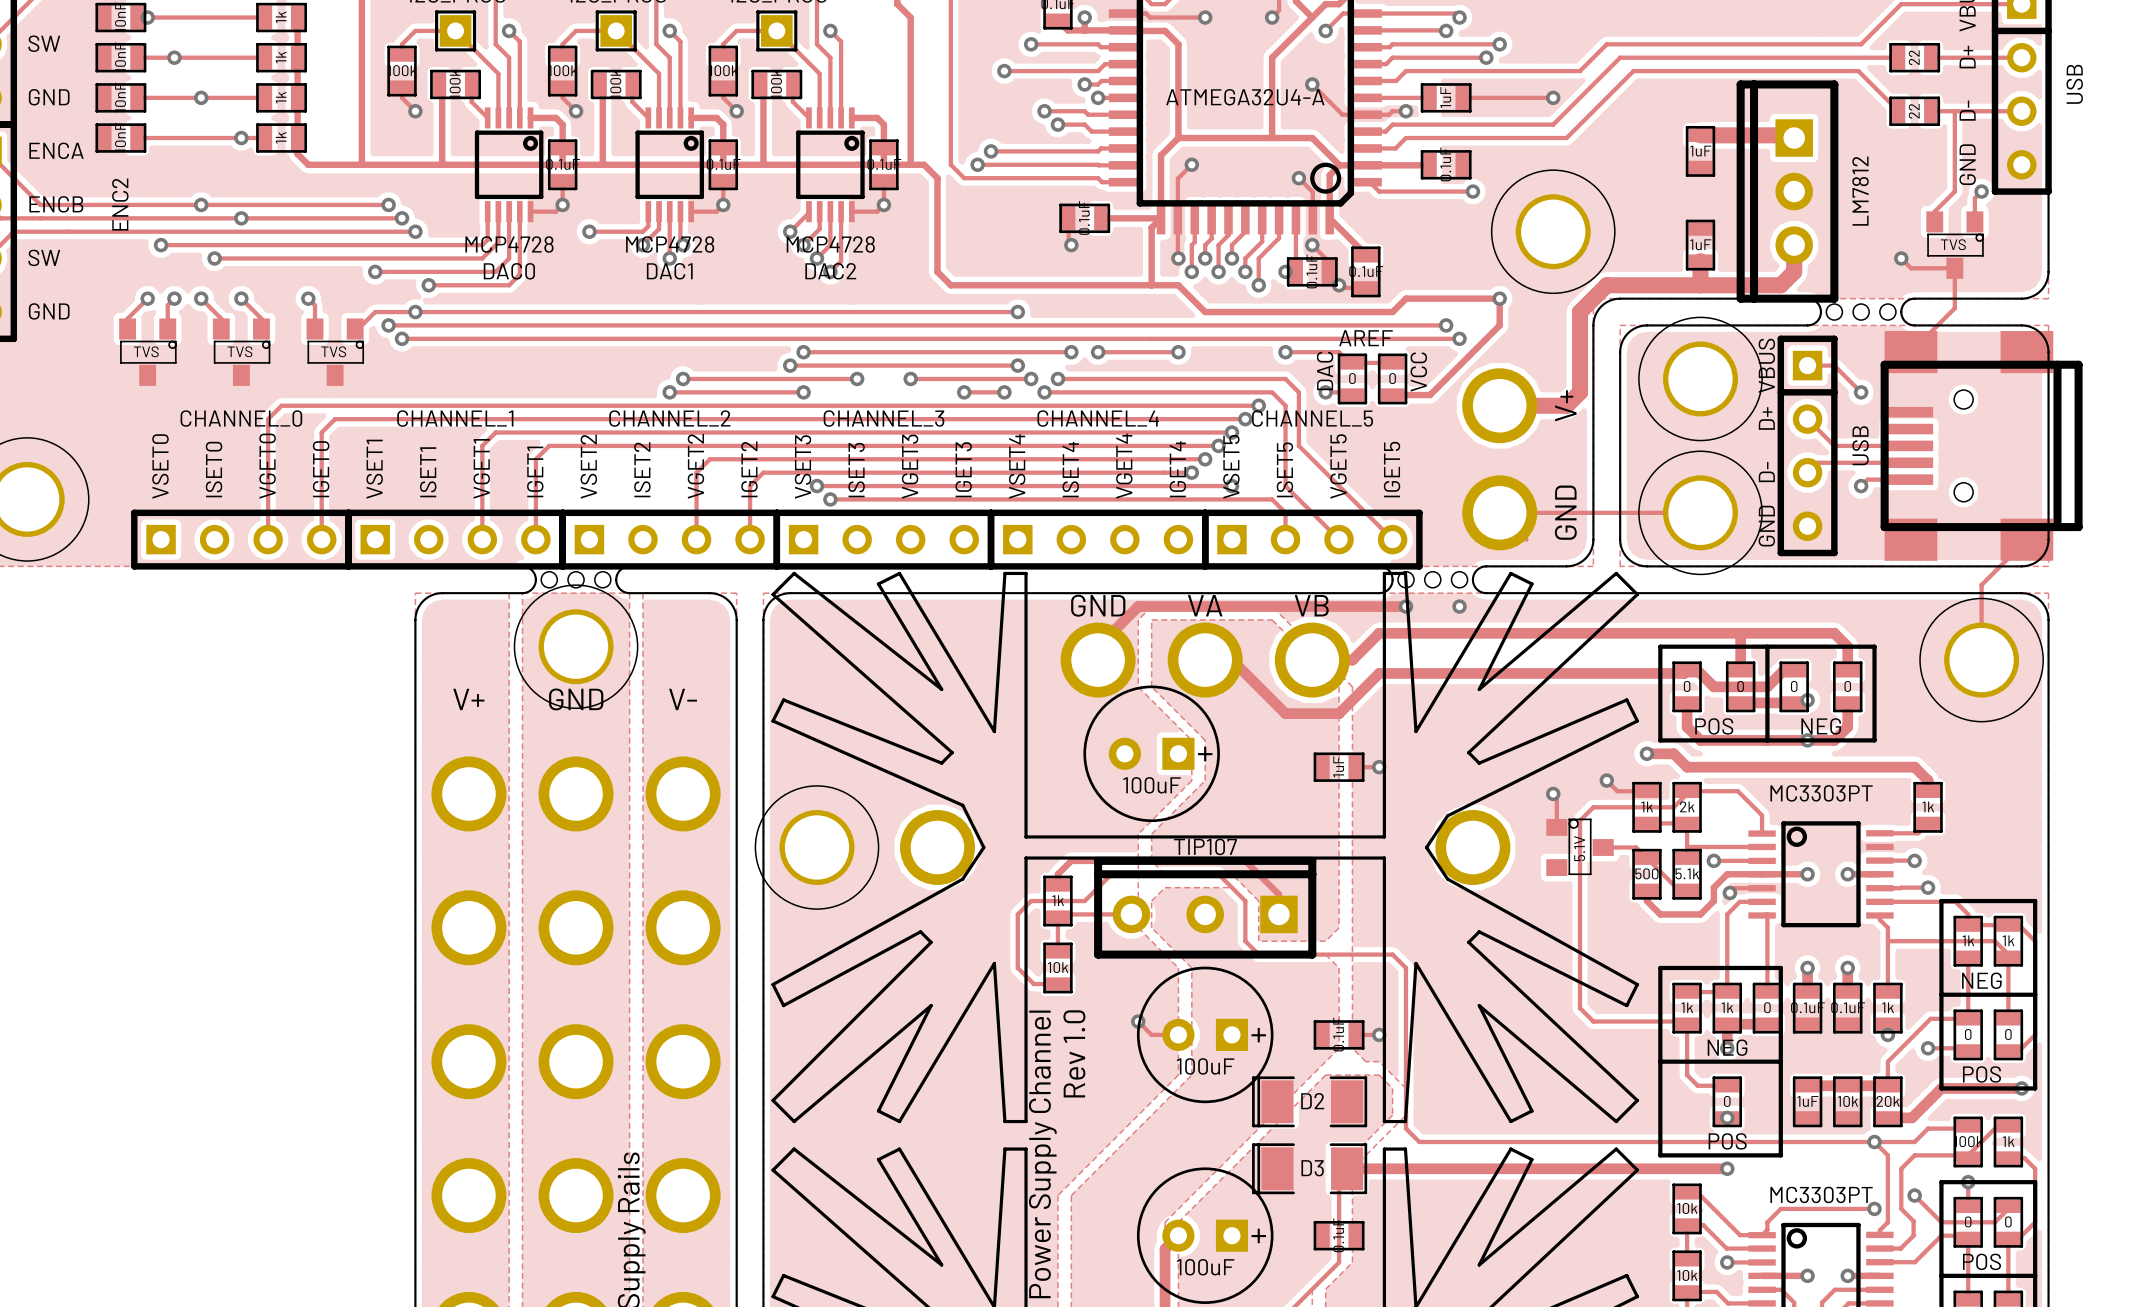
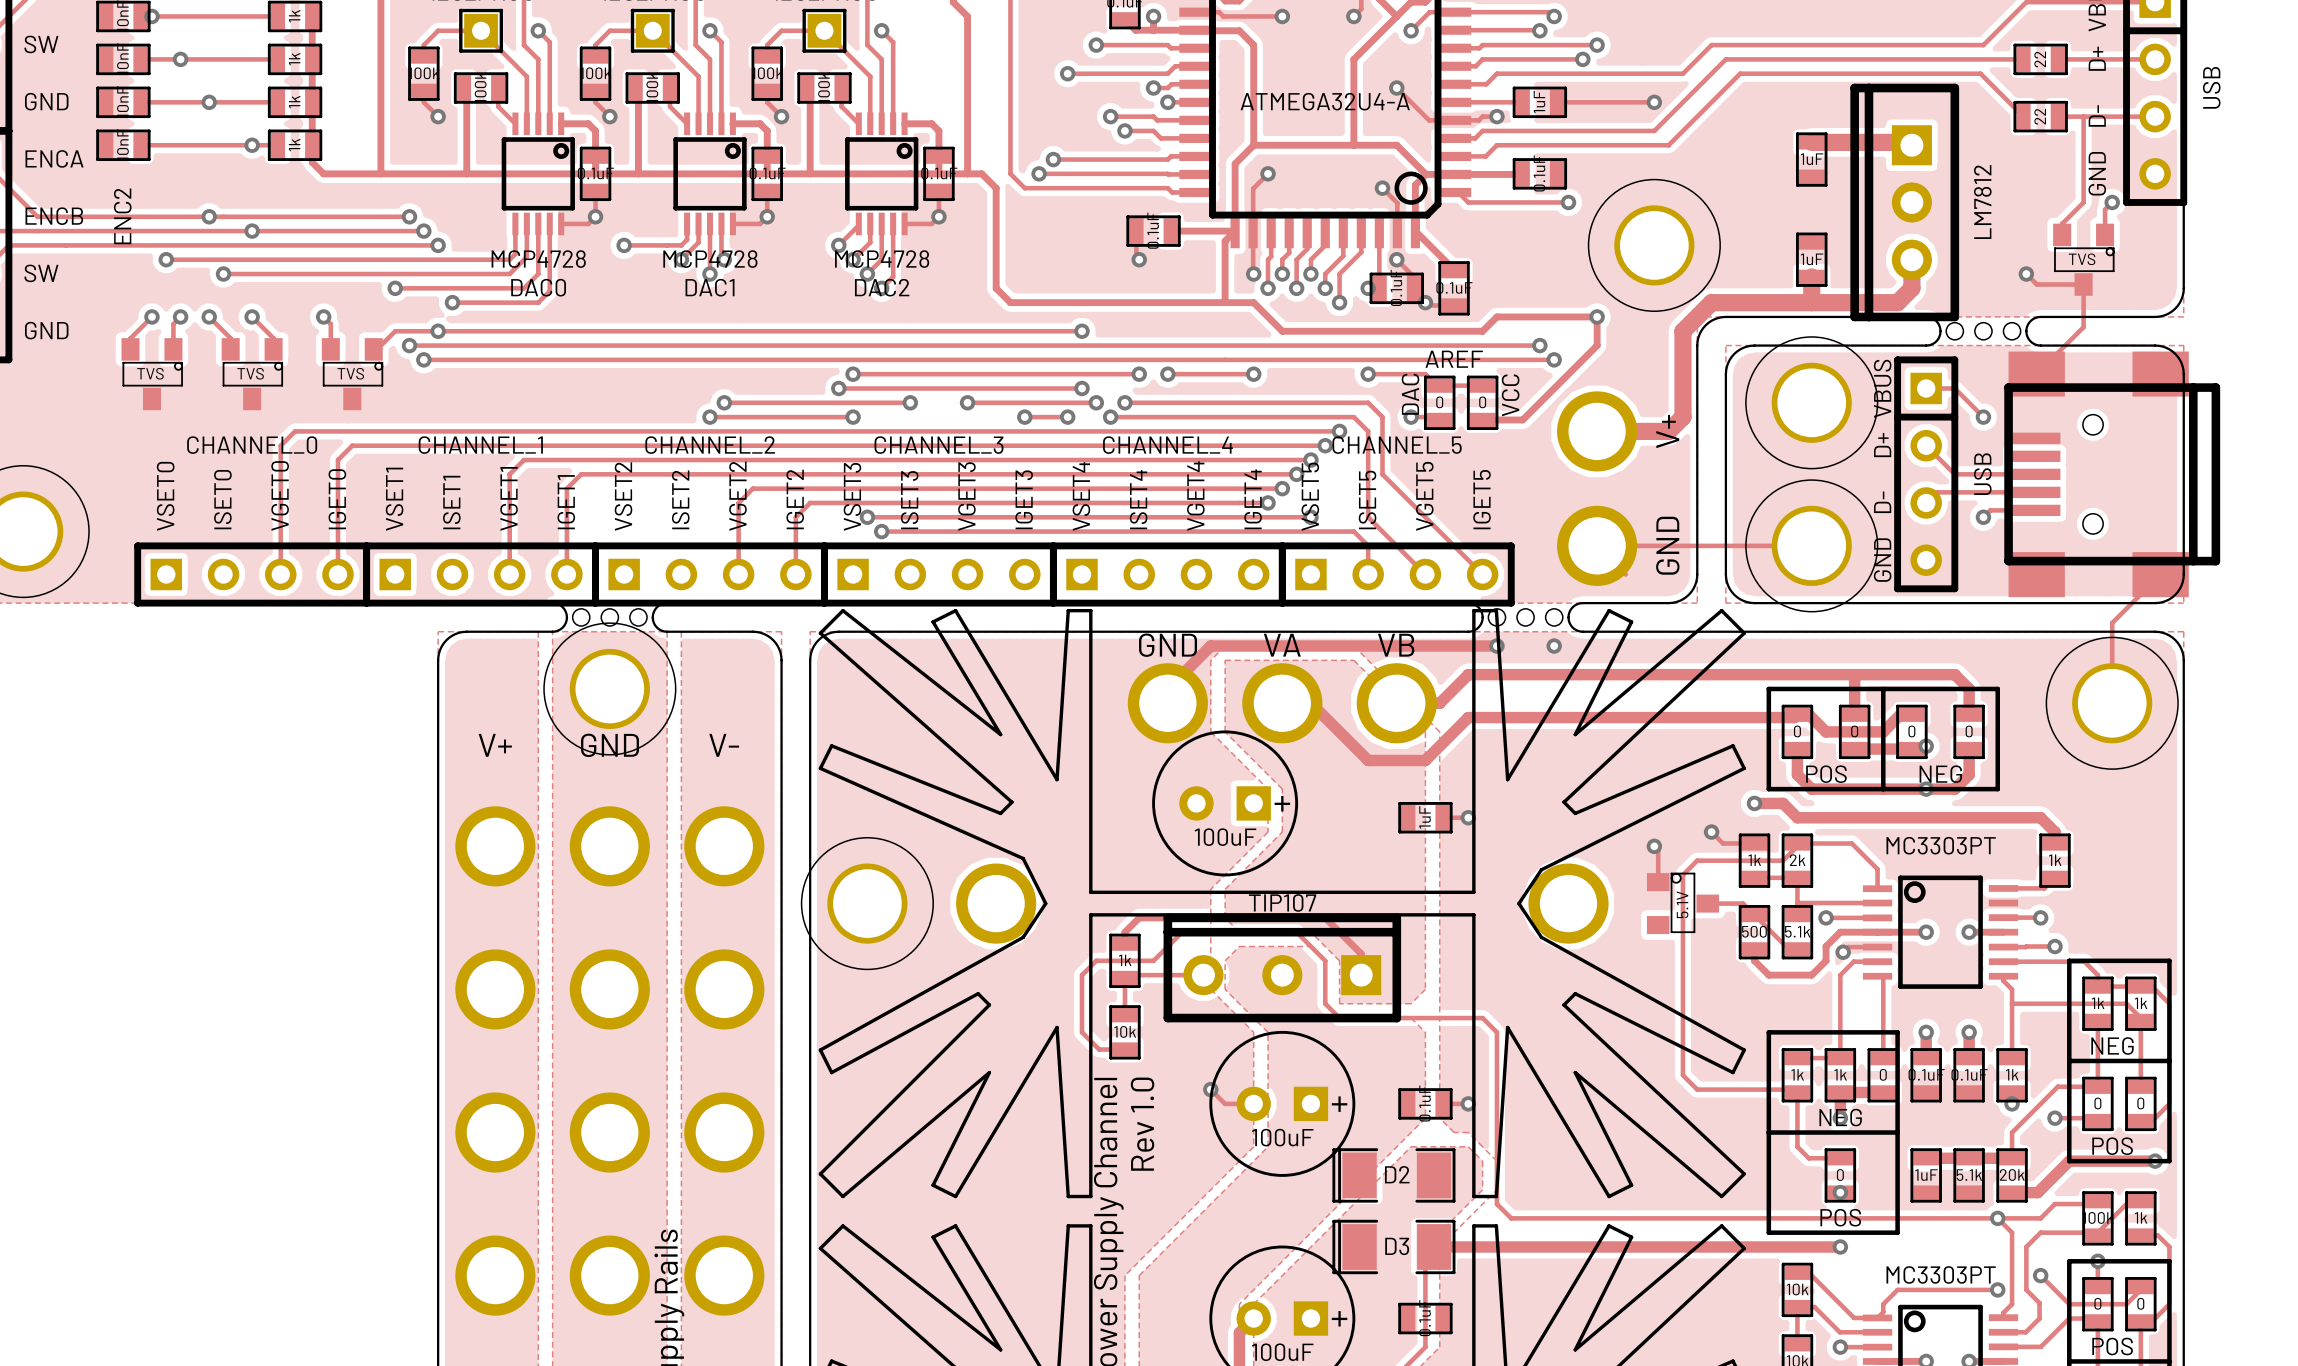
part value: 10k (1847, 1101) -> 5.1k (1969, 1175)

